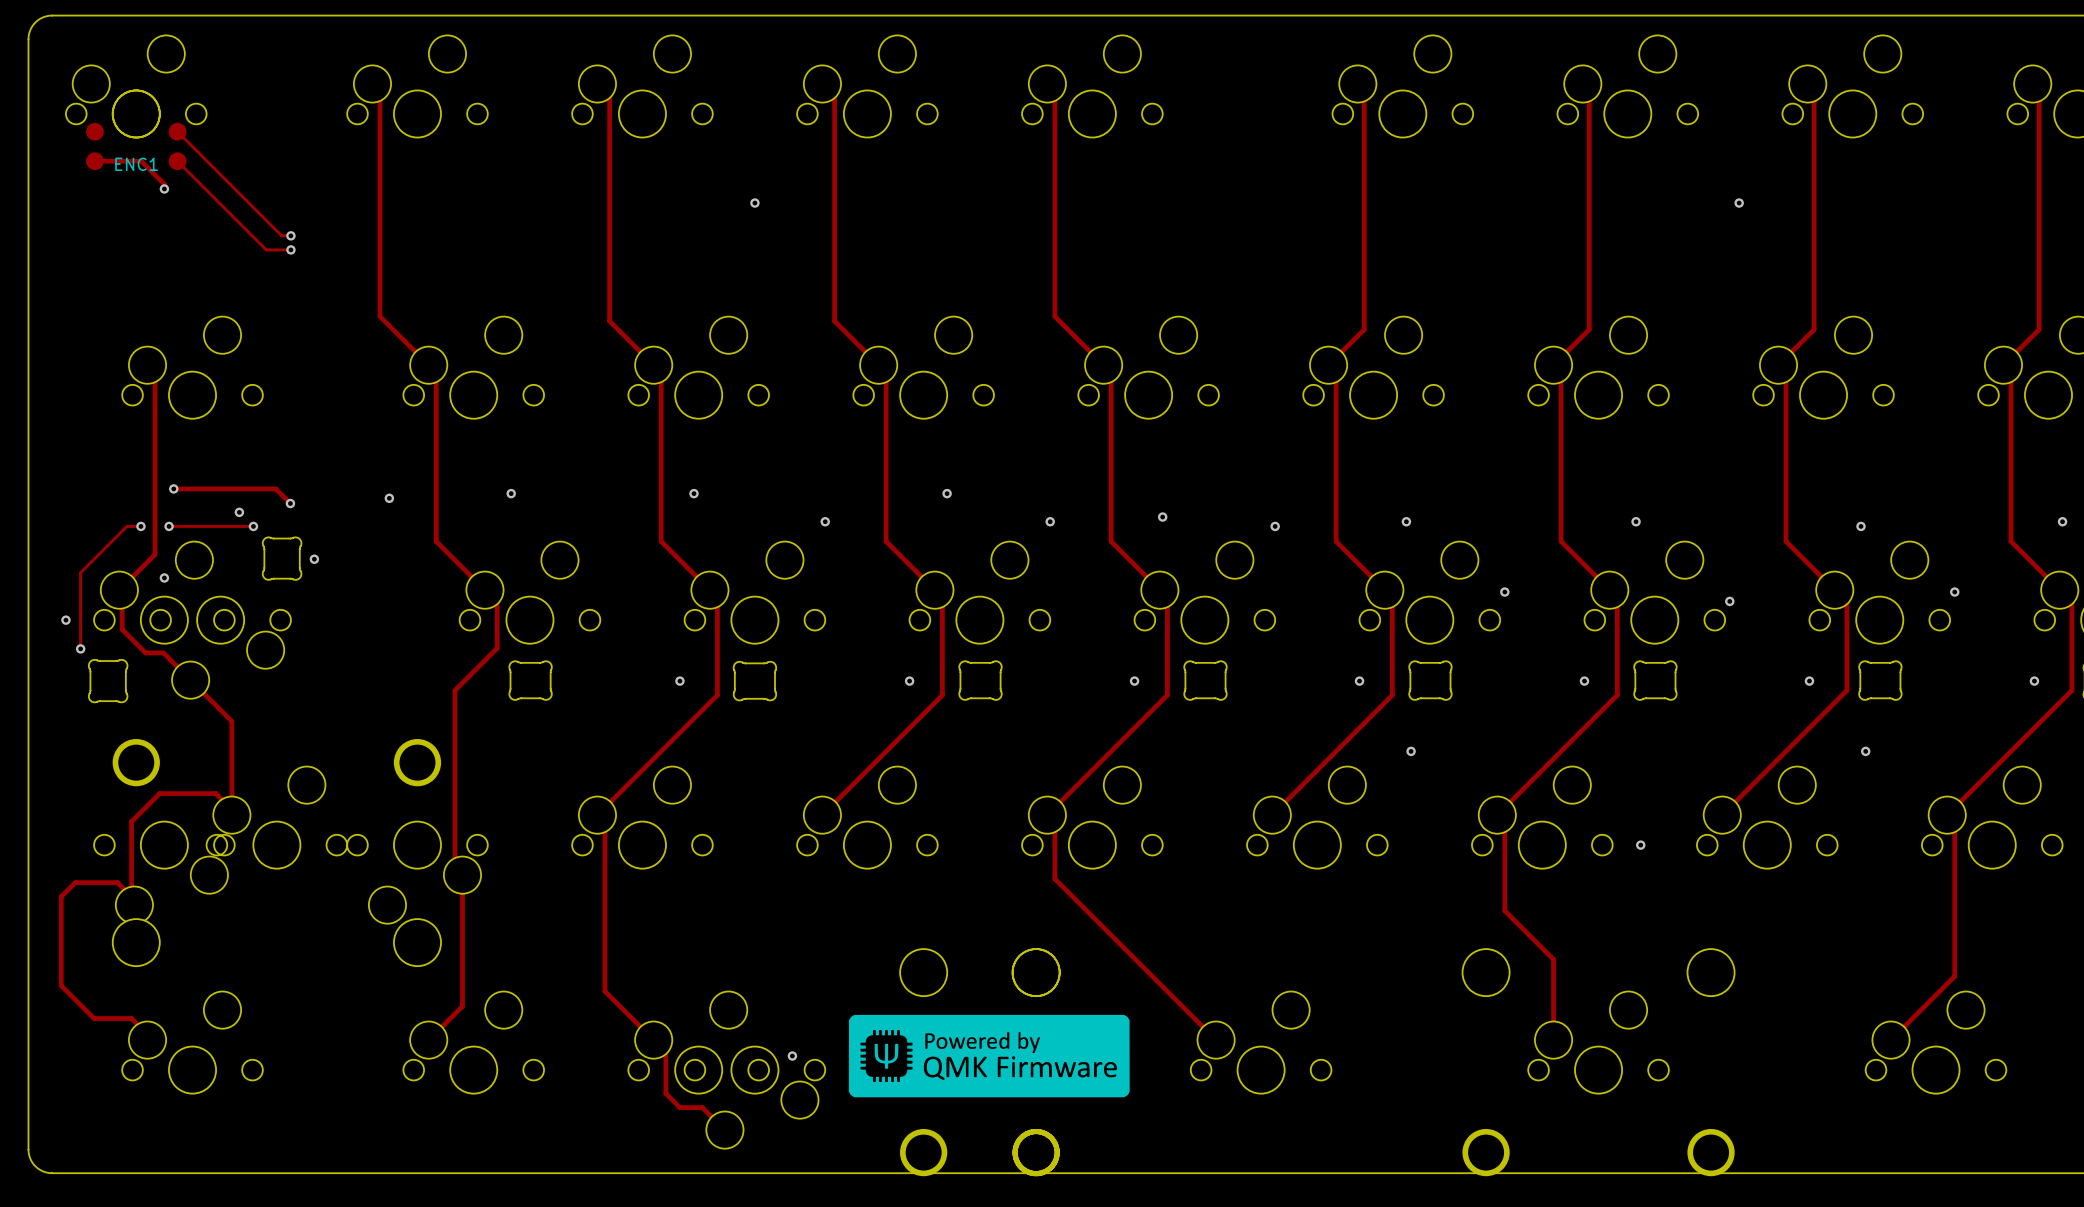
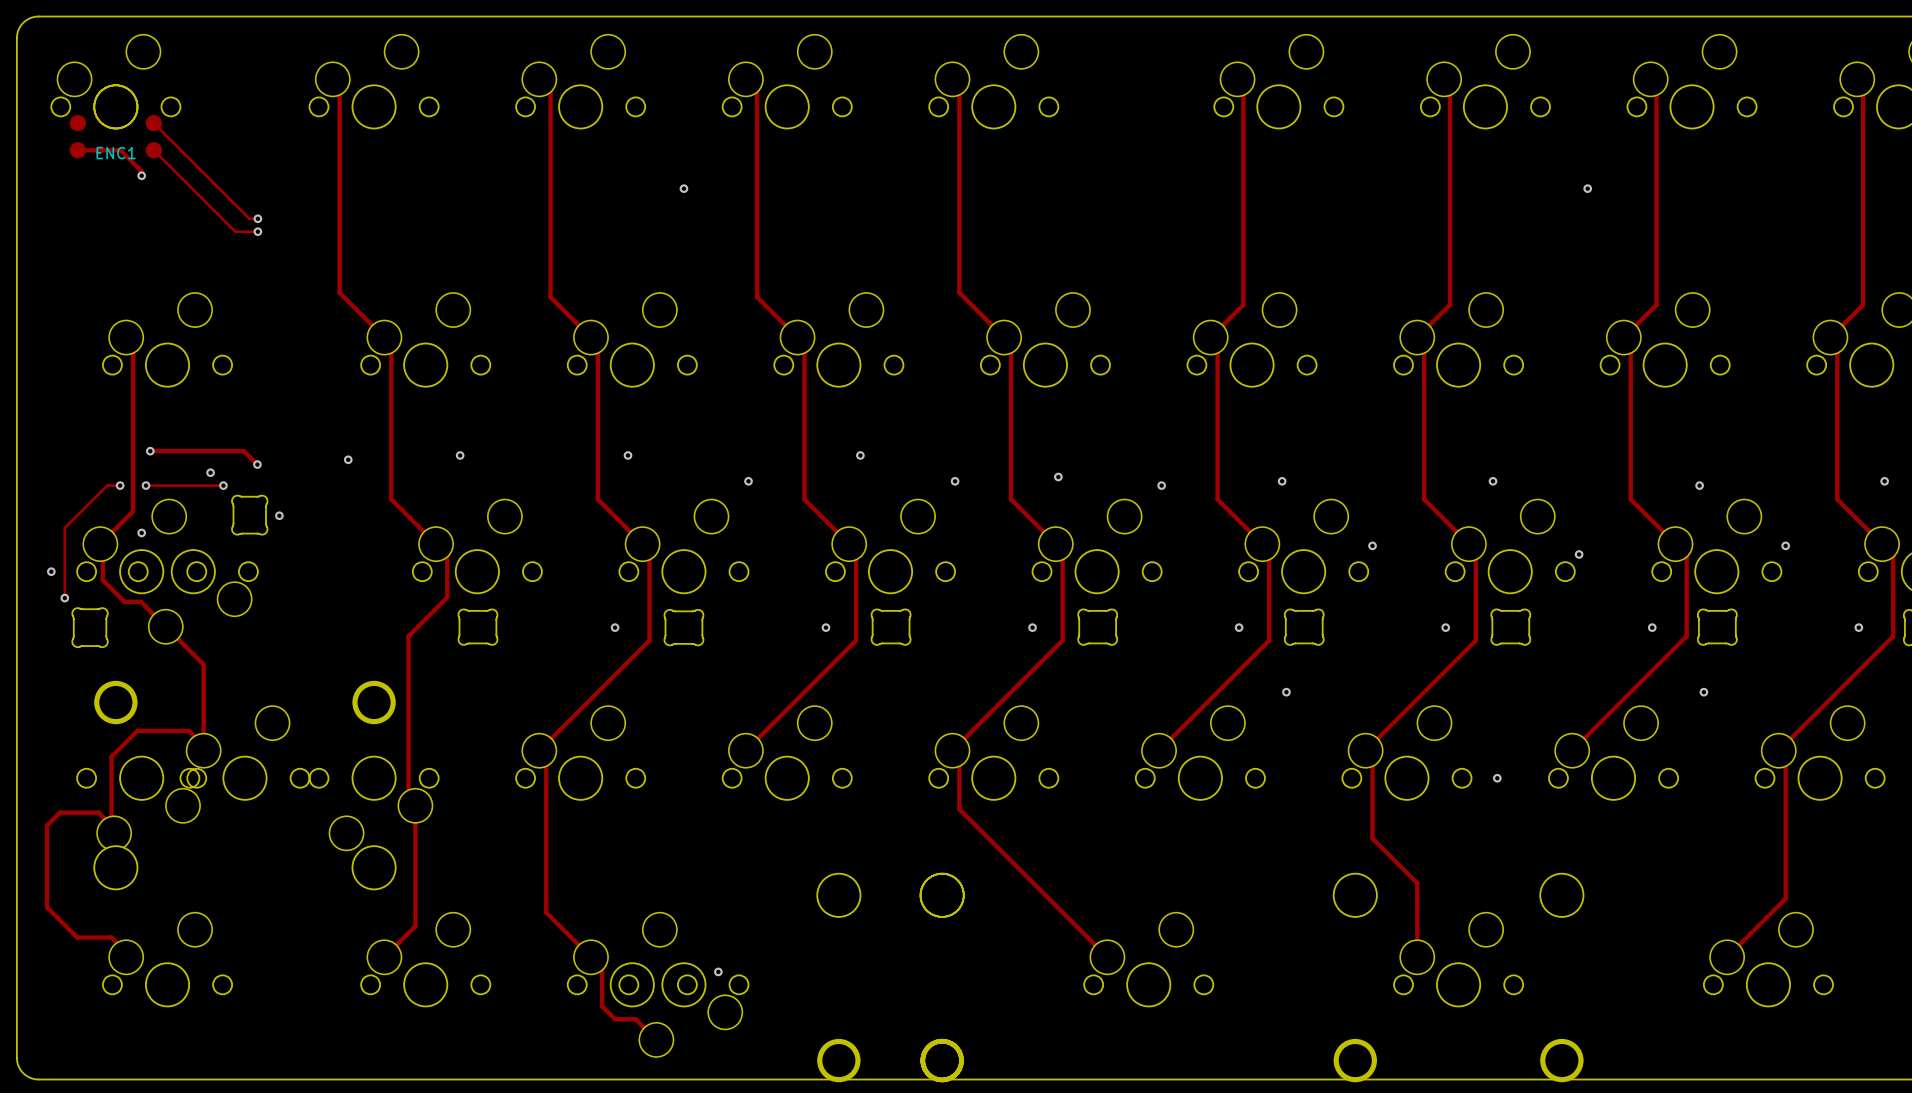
drawing: [848, 1014, 1130, 1098] -> none

